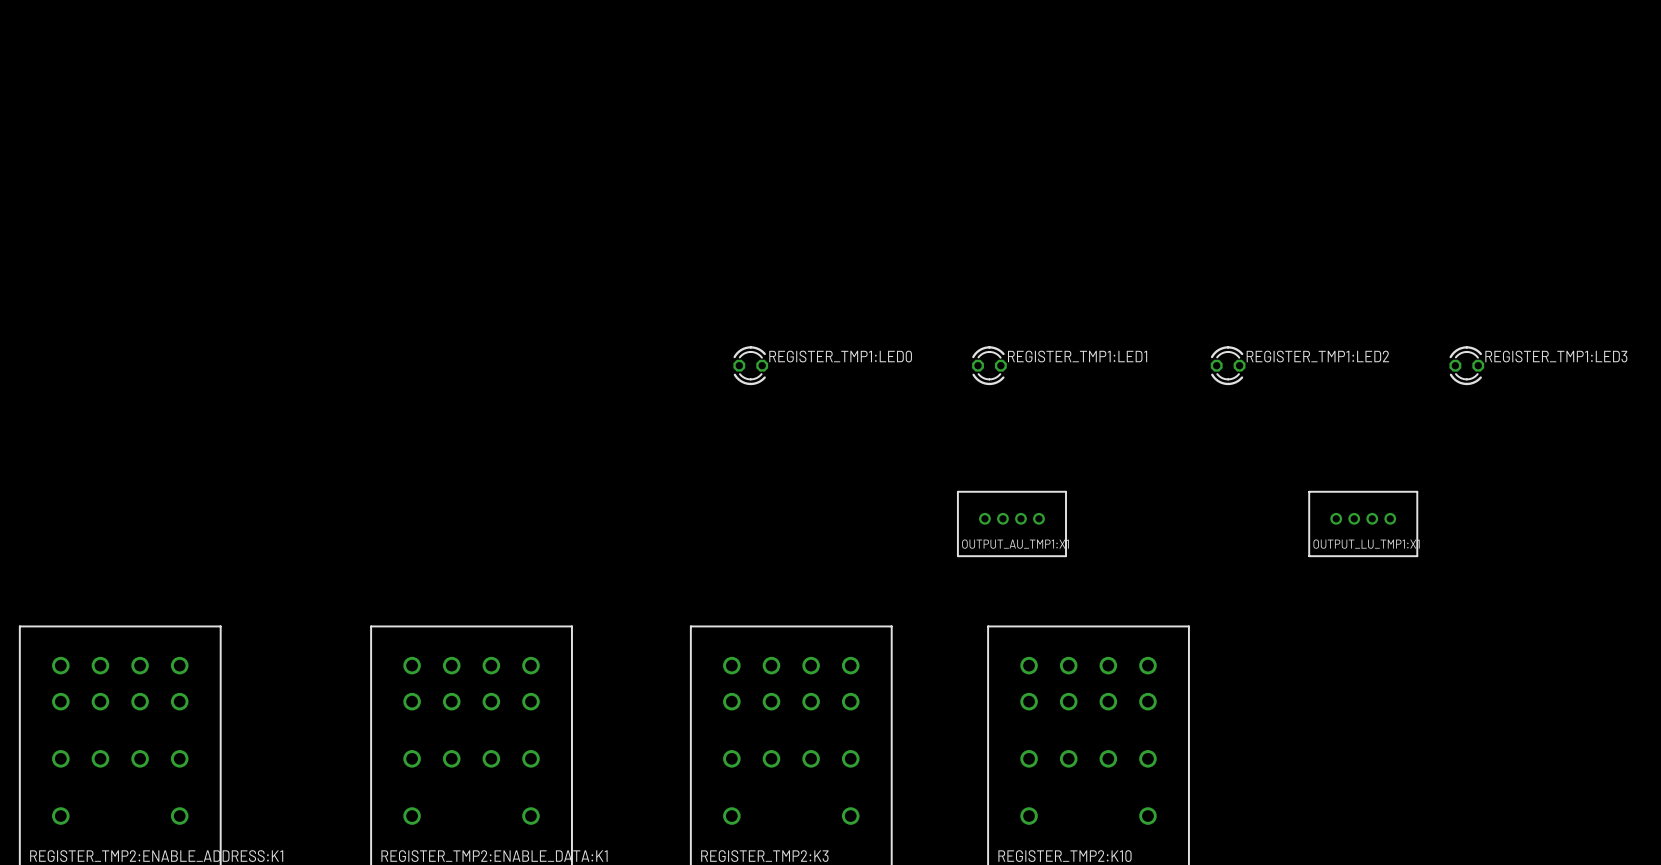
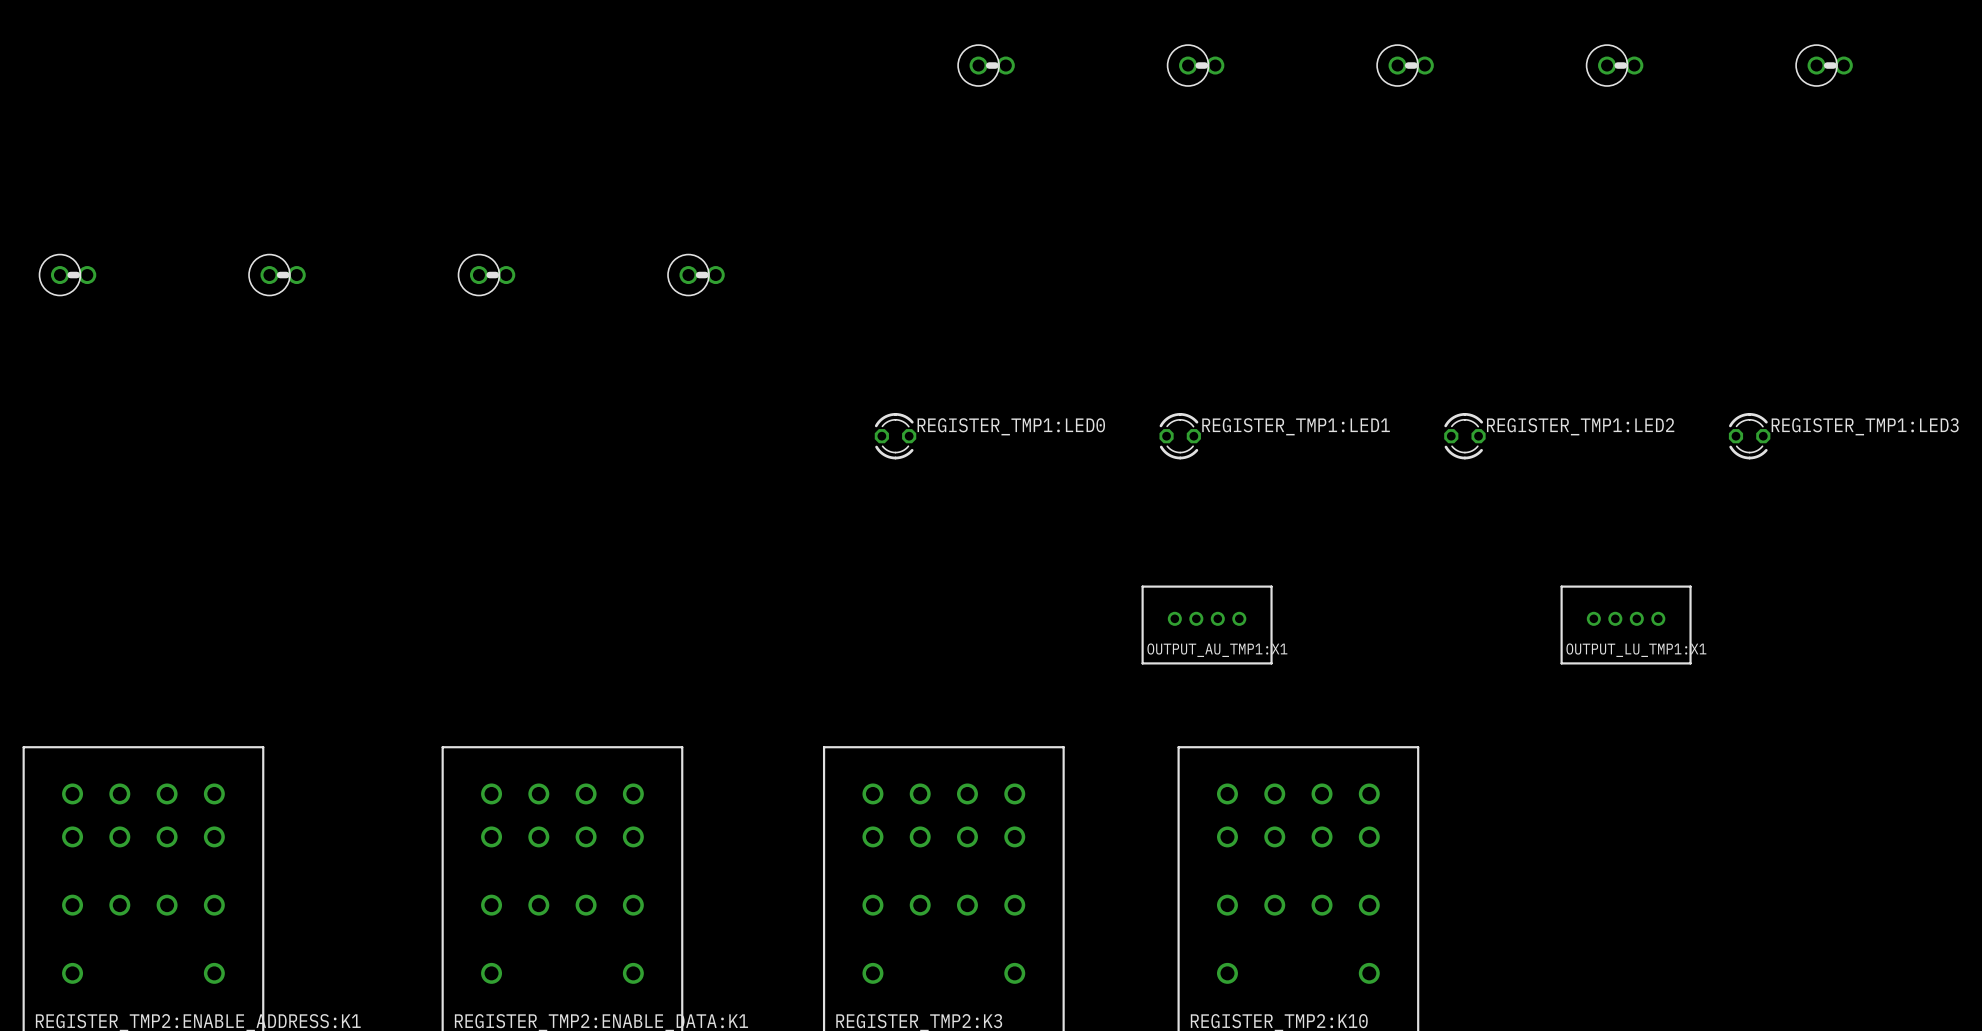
part: none -> (986, 65)
part: none -> (1195, 65)
part: none -> (1405, 65)
part: none -> (1614, 65)
part: none -> (1824, 65)
part: none -> (67, 275)
part: none -> (276, 275)
part: none -> (486, 275)
part: none -> (695, 275)

